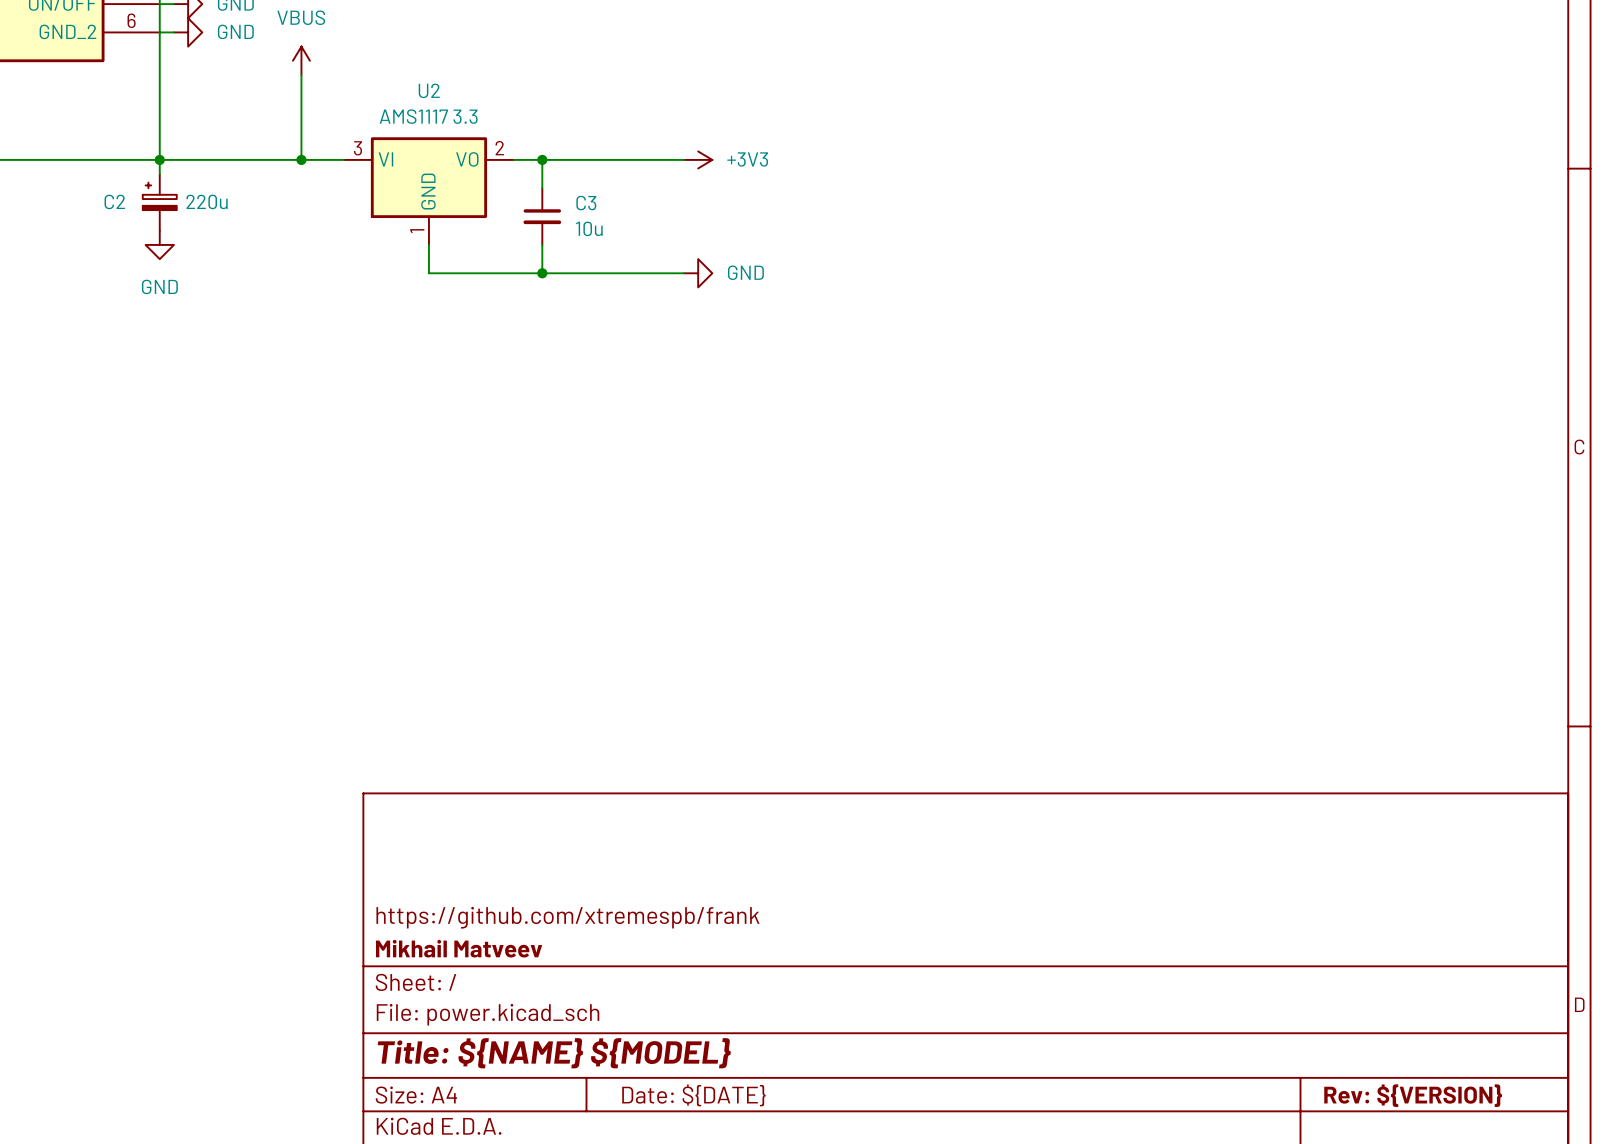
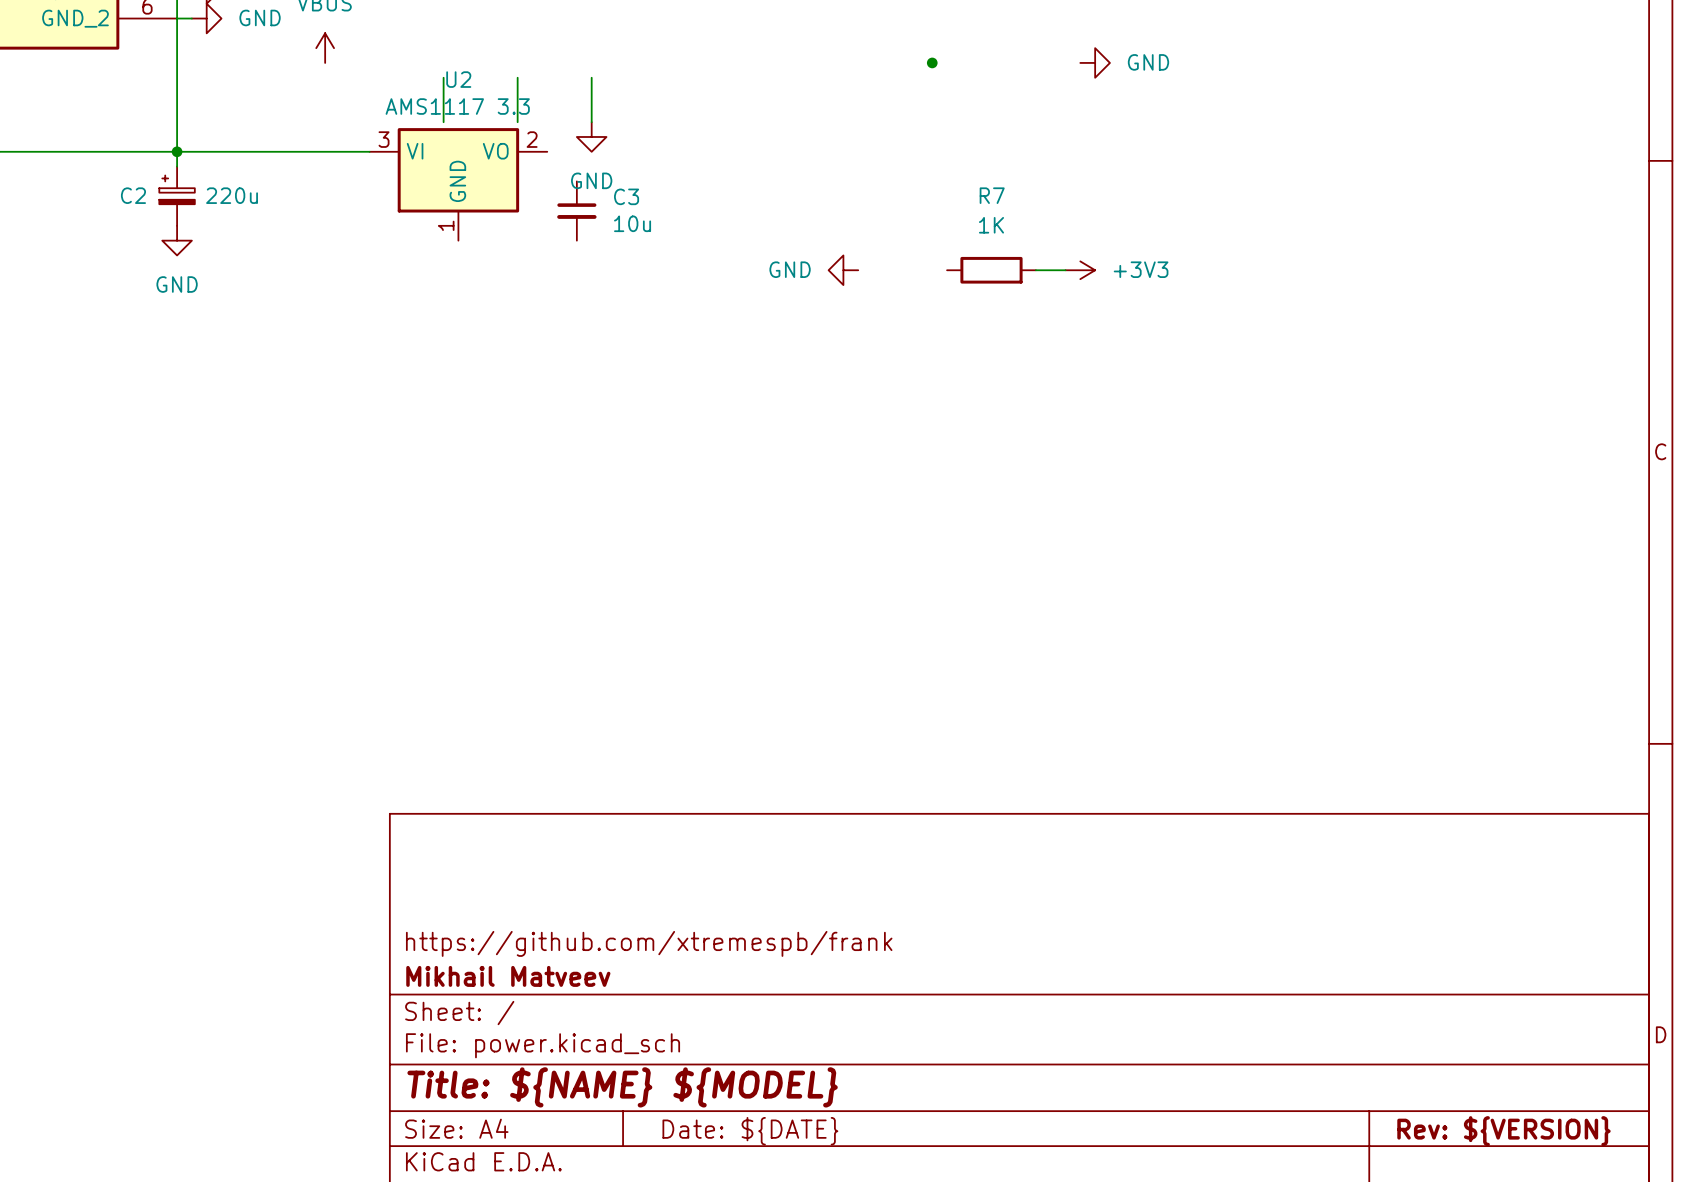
wire: (301, 74) (301, 159) -> none
junction: none -> (932, 62)
power symbol: none -> GND (1095, 62)
wire: none -> (443, 77) (443, 122)
wire: none -> (517, 77) (517, 122)
wire: none -> (591, 77) (591, 122)
power symbol: none -> GND (591, 136)
junction: (301, 159) -> none
wire: (513, 159) (683, 159) -> none
wire: (542, 159) (542, 188) -> none
junction: (542, 159) -> none
power symbol: +3V3 (698, 159) -> none
wire: (428, 244) (428, 273) (683, 273) -> none
wire: (542, 244) (542, 273) -> none
junction: (542, 273) -> none
power symbol: GND (698, 273) -> none
power symbol: none -> GND (843, 270)
R7: none -> 1K (991, 270)
wire: none -> (1035, 270) (1065, 270)
power symbol: none -> +3V3 (1080, 270)

